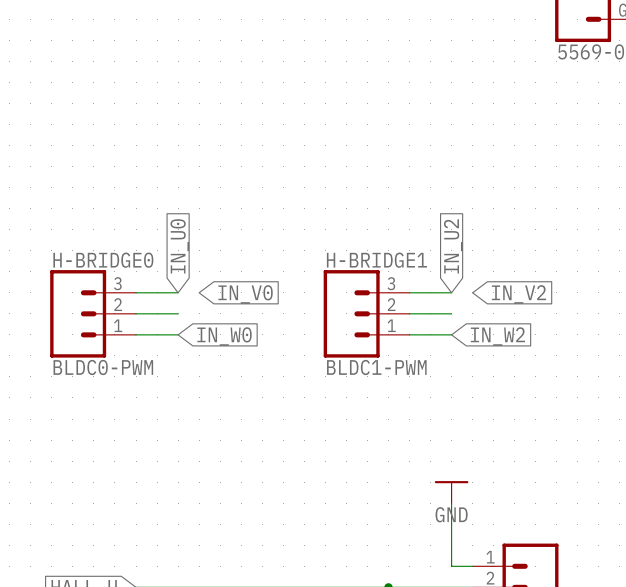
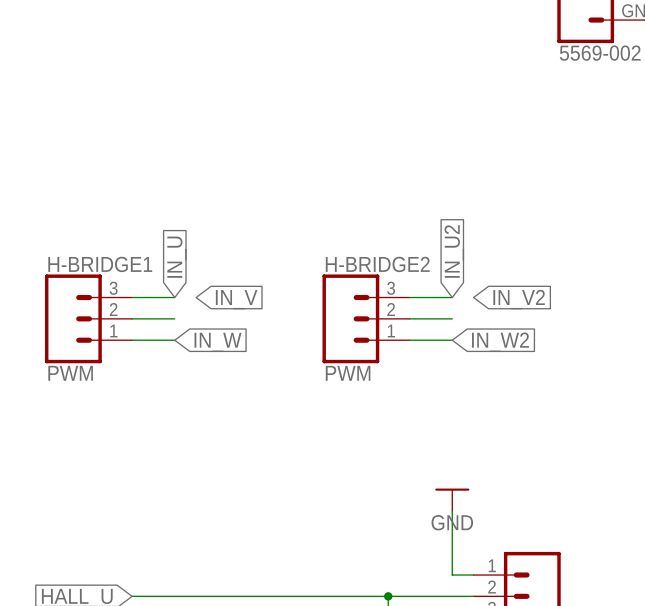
global label: IN_U0 (179, 246) -> IN_U (176, 257)
H-BRIDGE0 name: H-BRIDGE0 (103, 260) -> H-BRIDGE1 (100, 264)
H-BRIDGE1 name: H-BRIDGE1 (376, 260) -> H-BRIDGE2 (377, 264)
global label: IN_V0 (245, 294) -> IN_V (236, 299)
global label: IN_W0 (224, 336) -> IN_W (218, 342)
H-BRIDGE0 value: BLDC0-PWM (103, 367) -> PWM (70, 373)
H-BRIDGE1 value: BLDC1-PWM (376, 367) -> PWM (348, 373)

